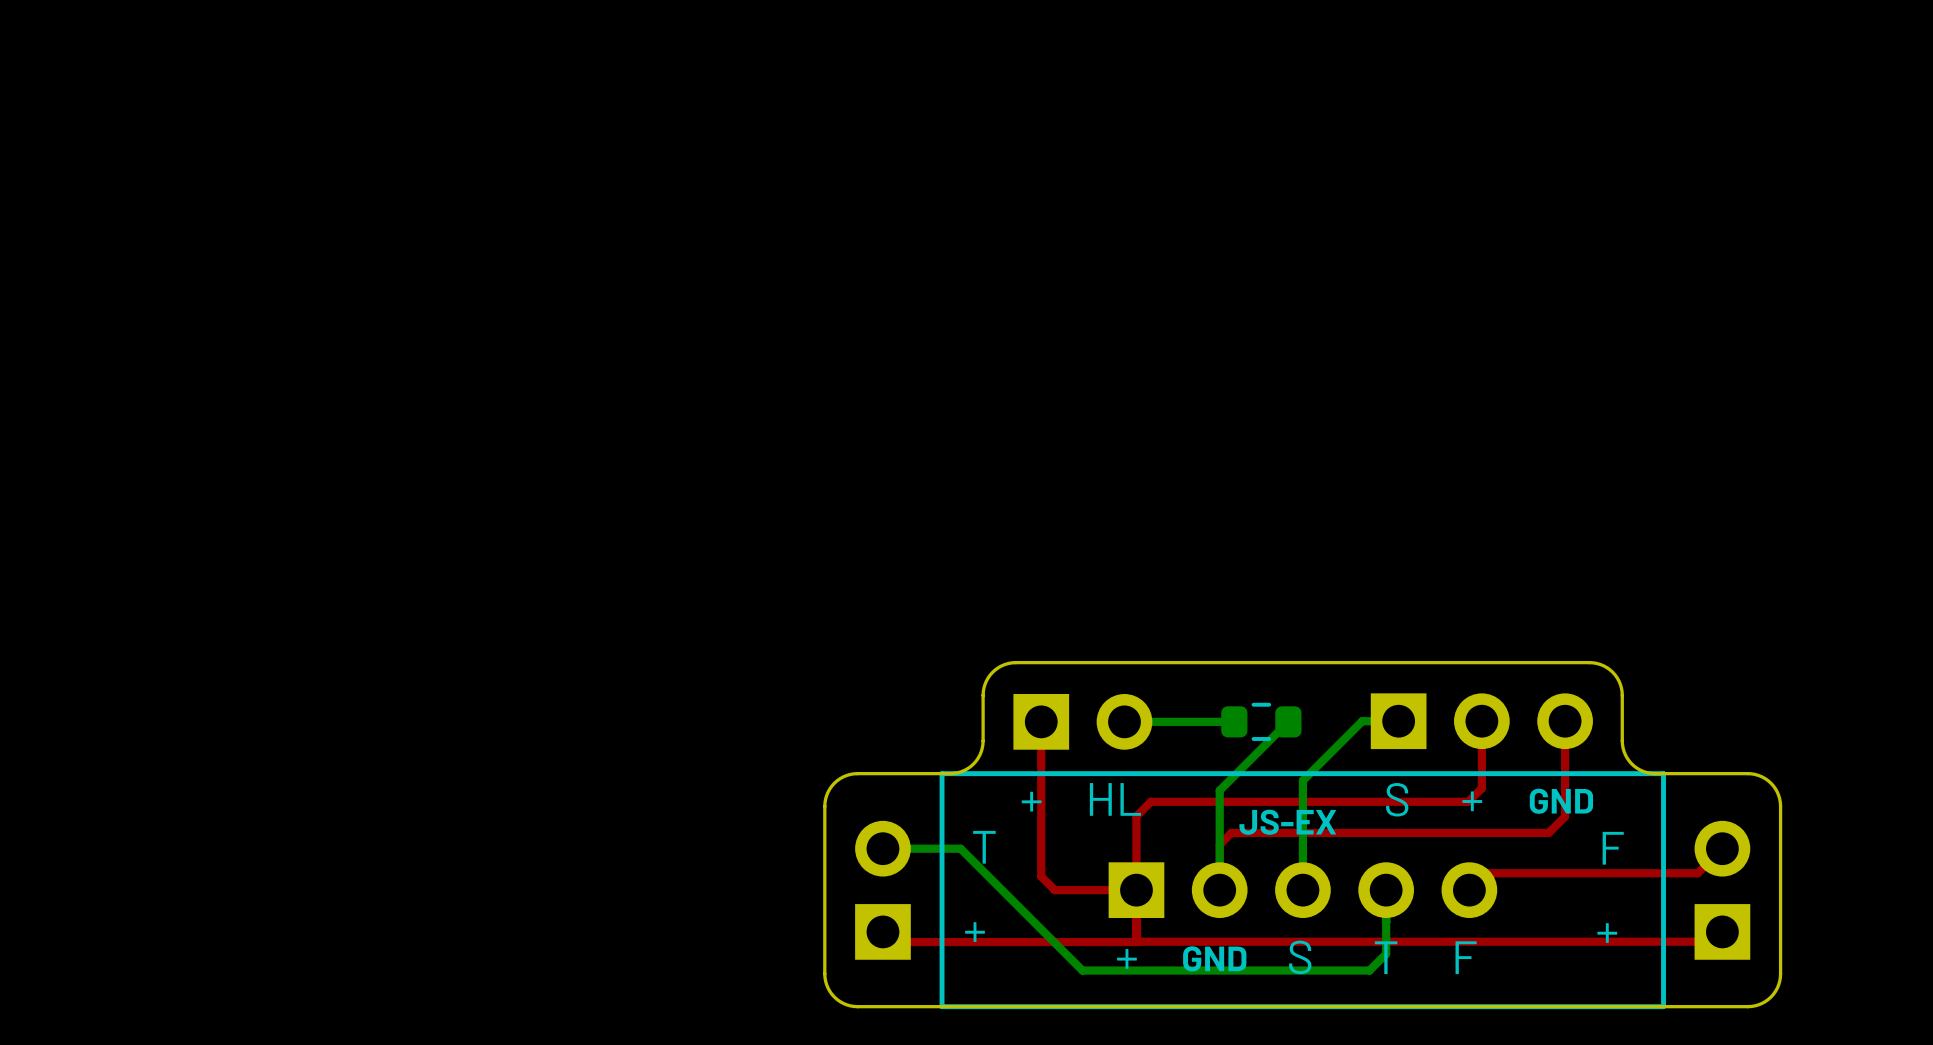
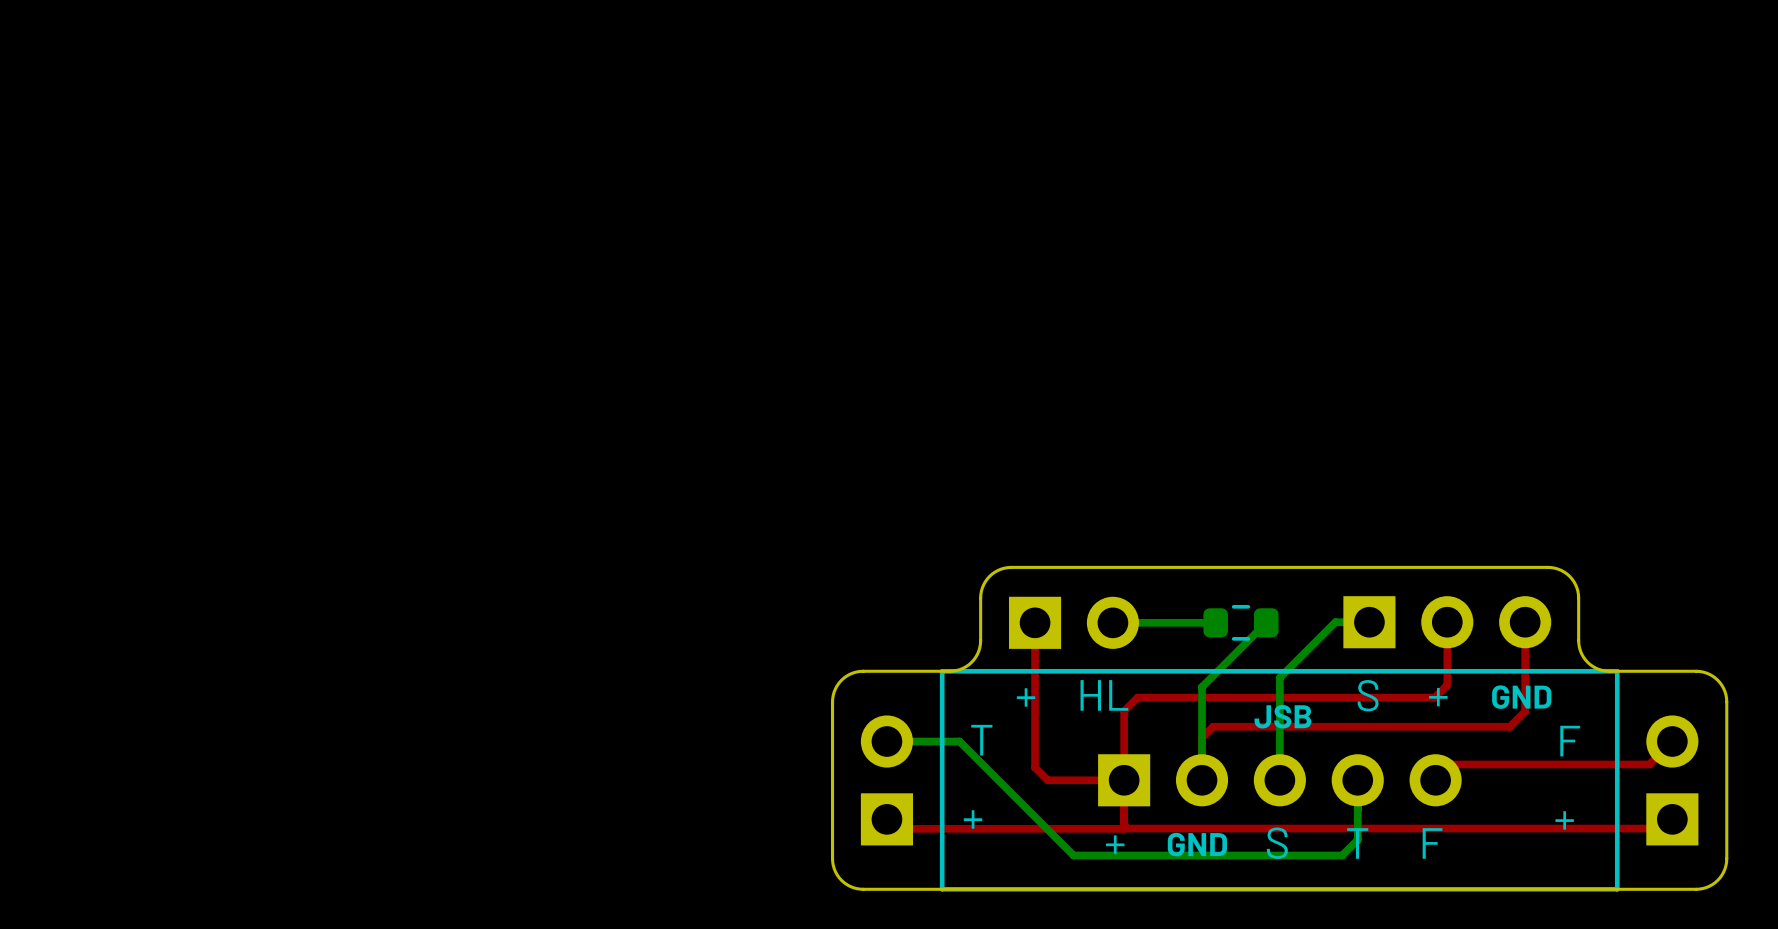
text: JS-EX (1287, 822) -> none
text: none -> JSB (1282, 716)

